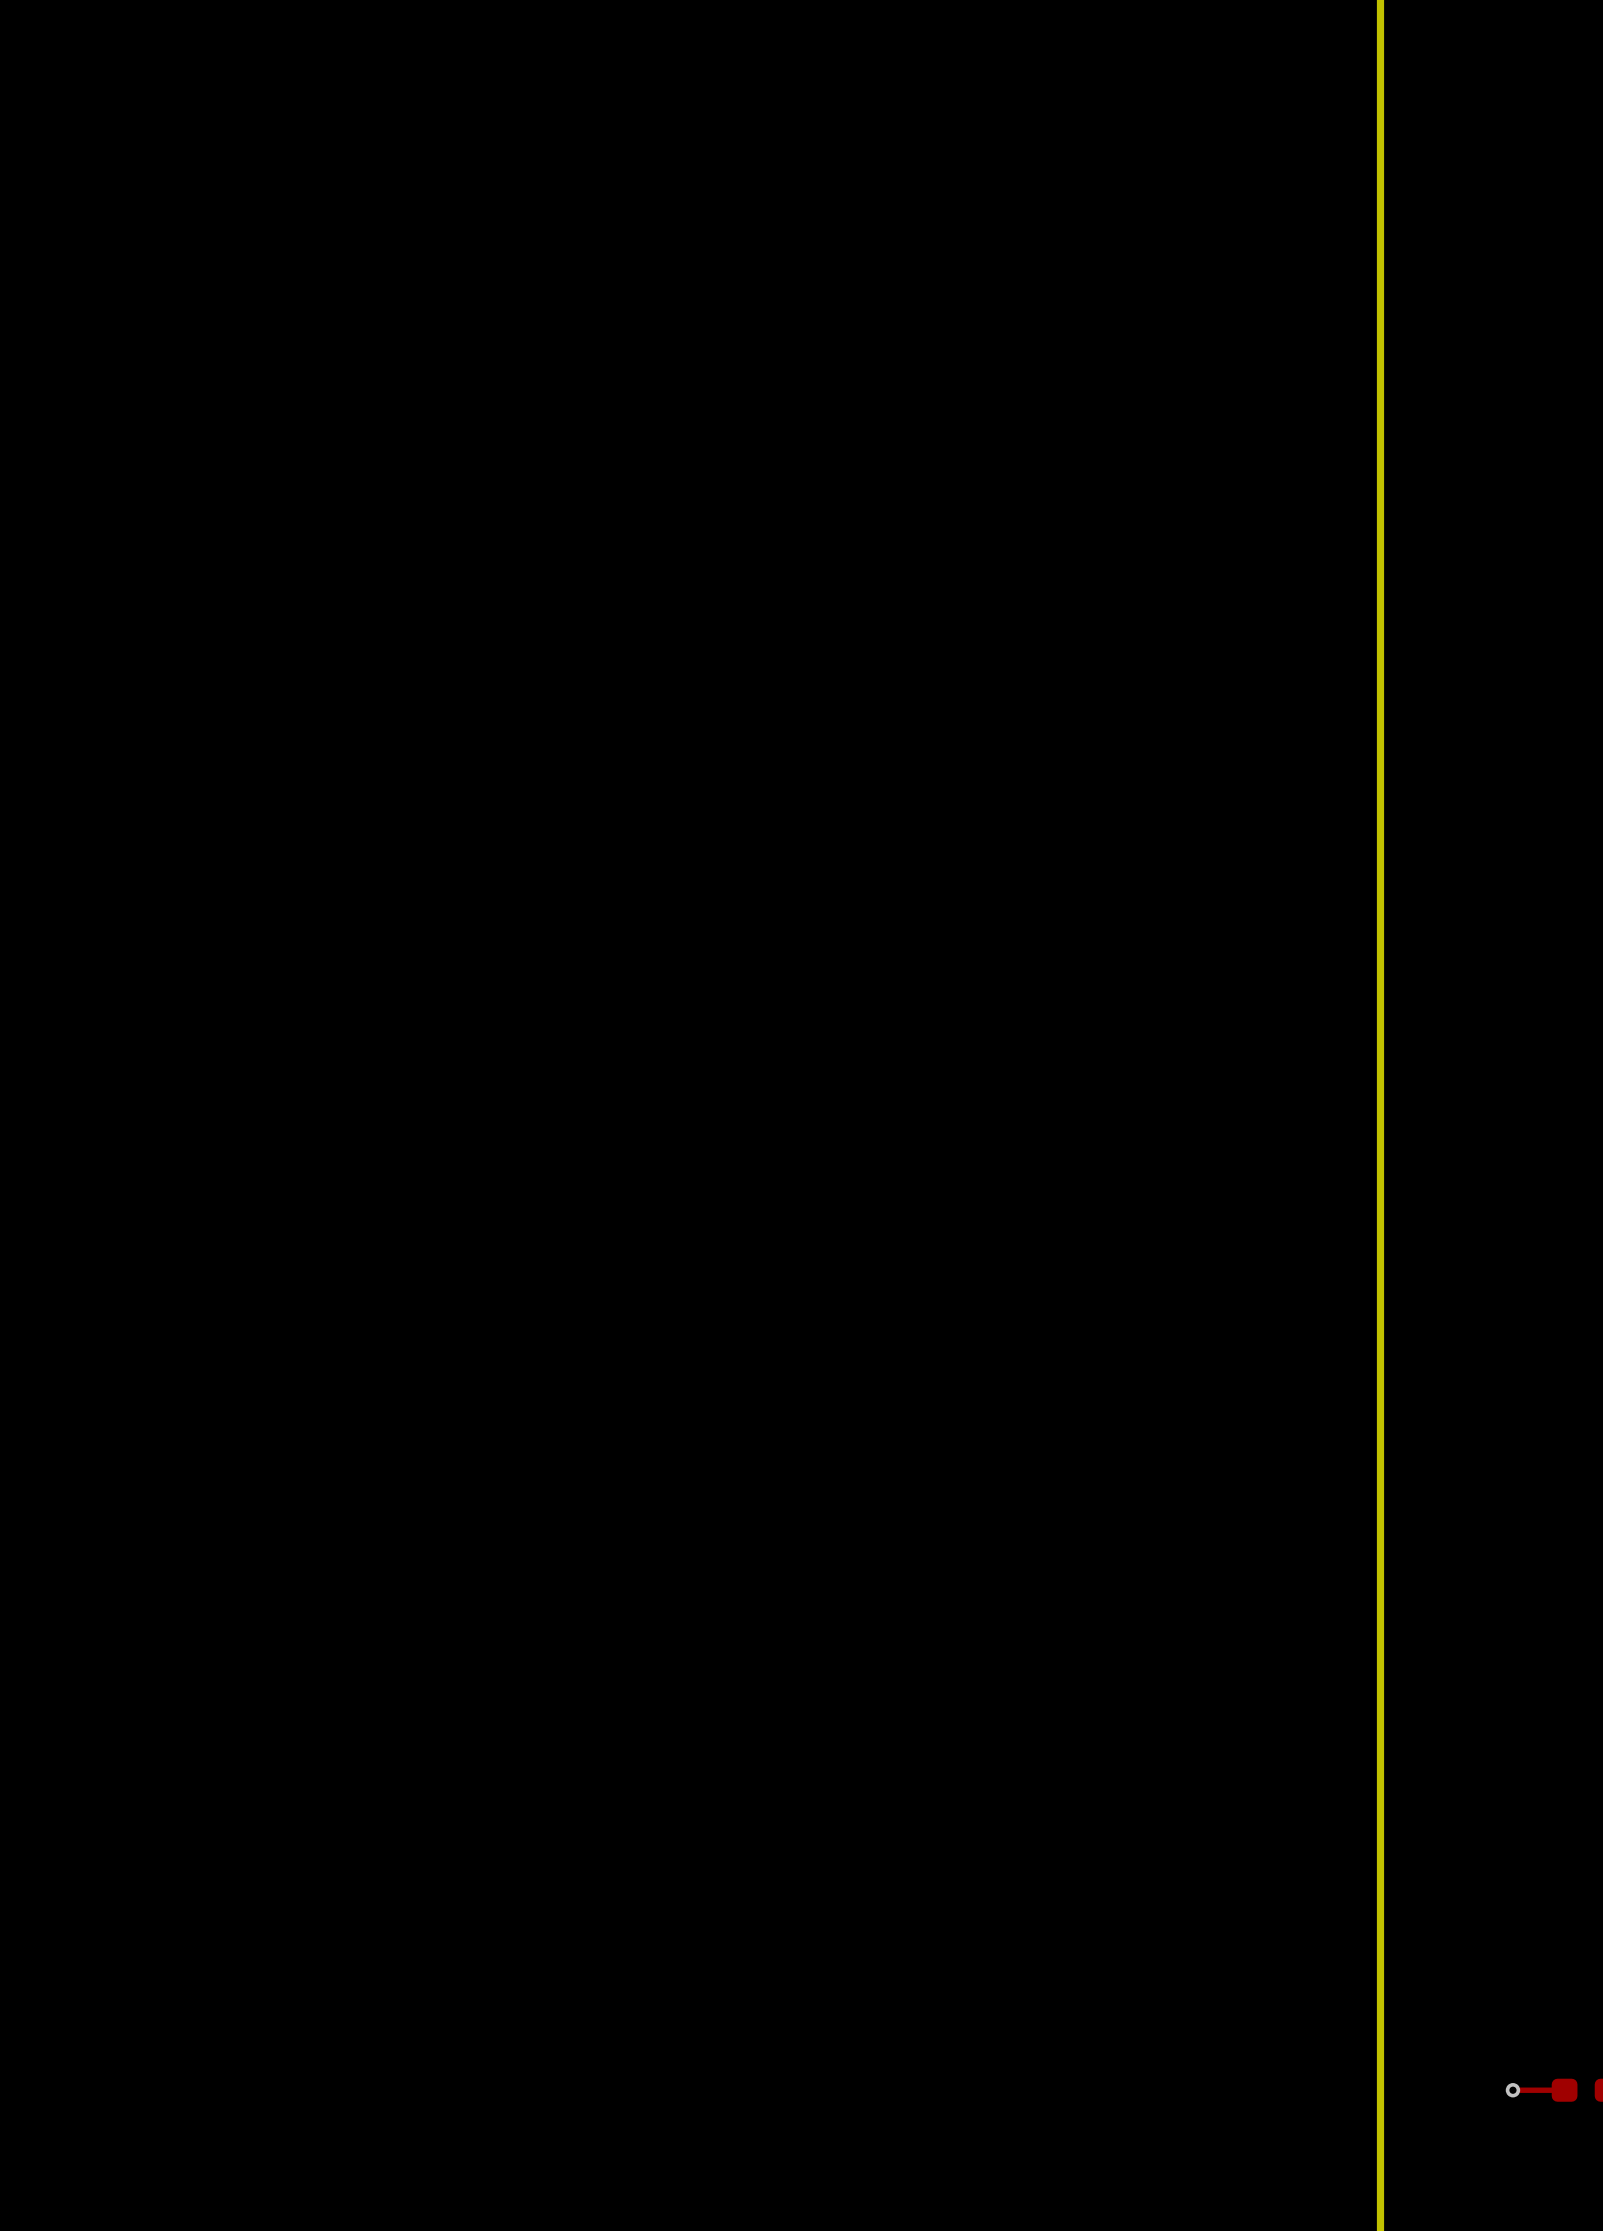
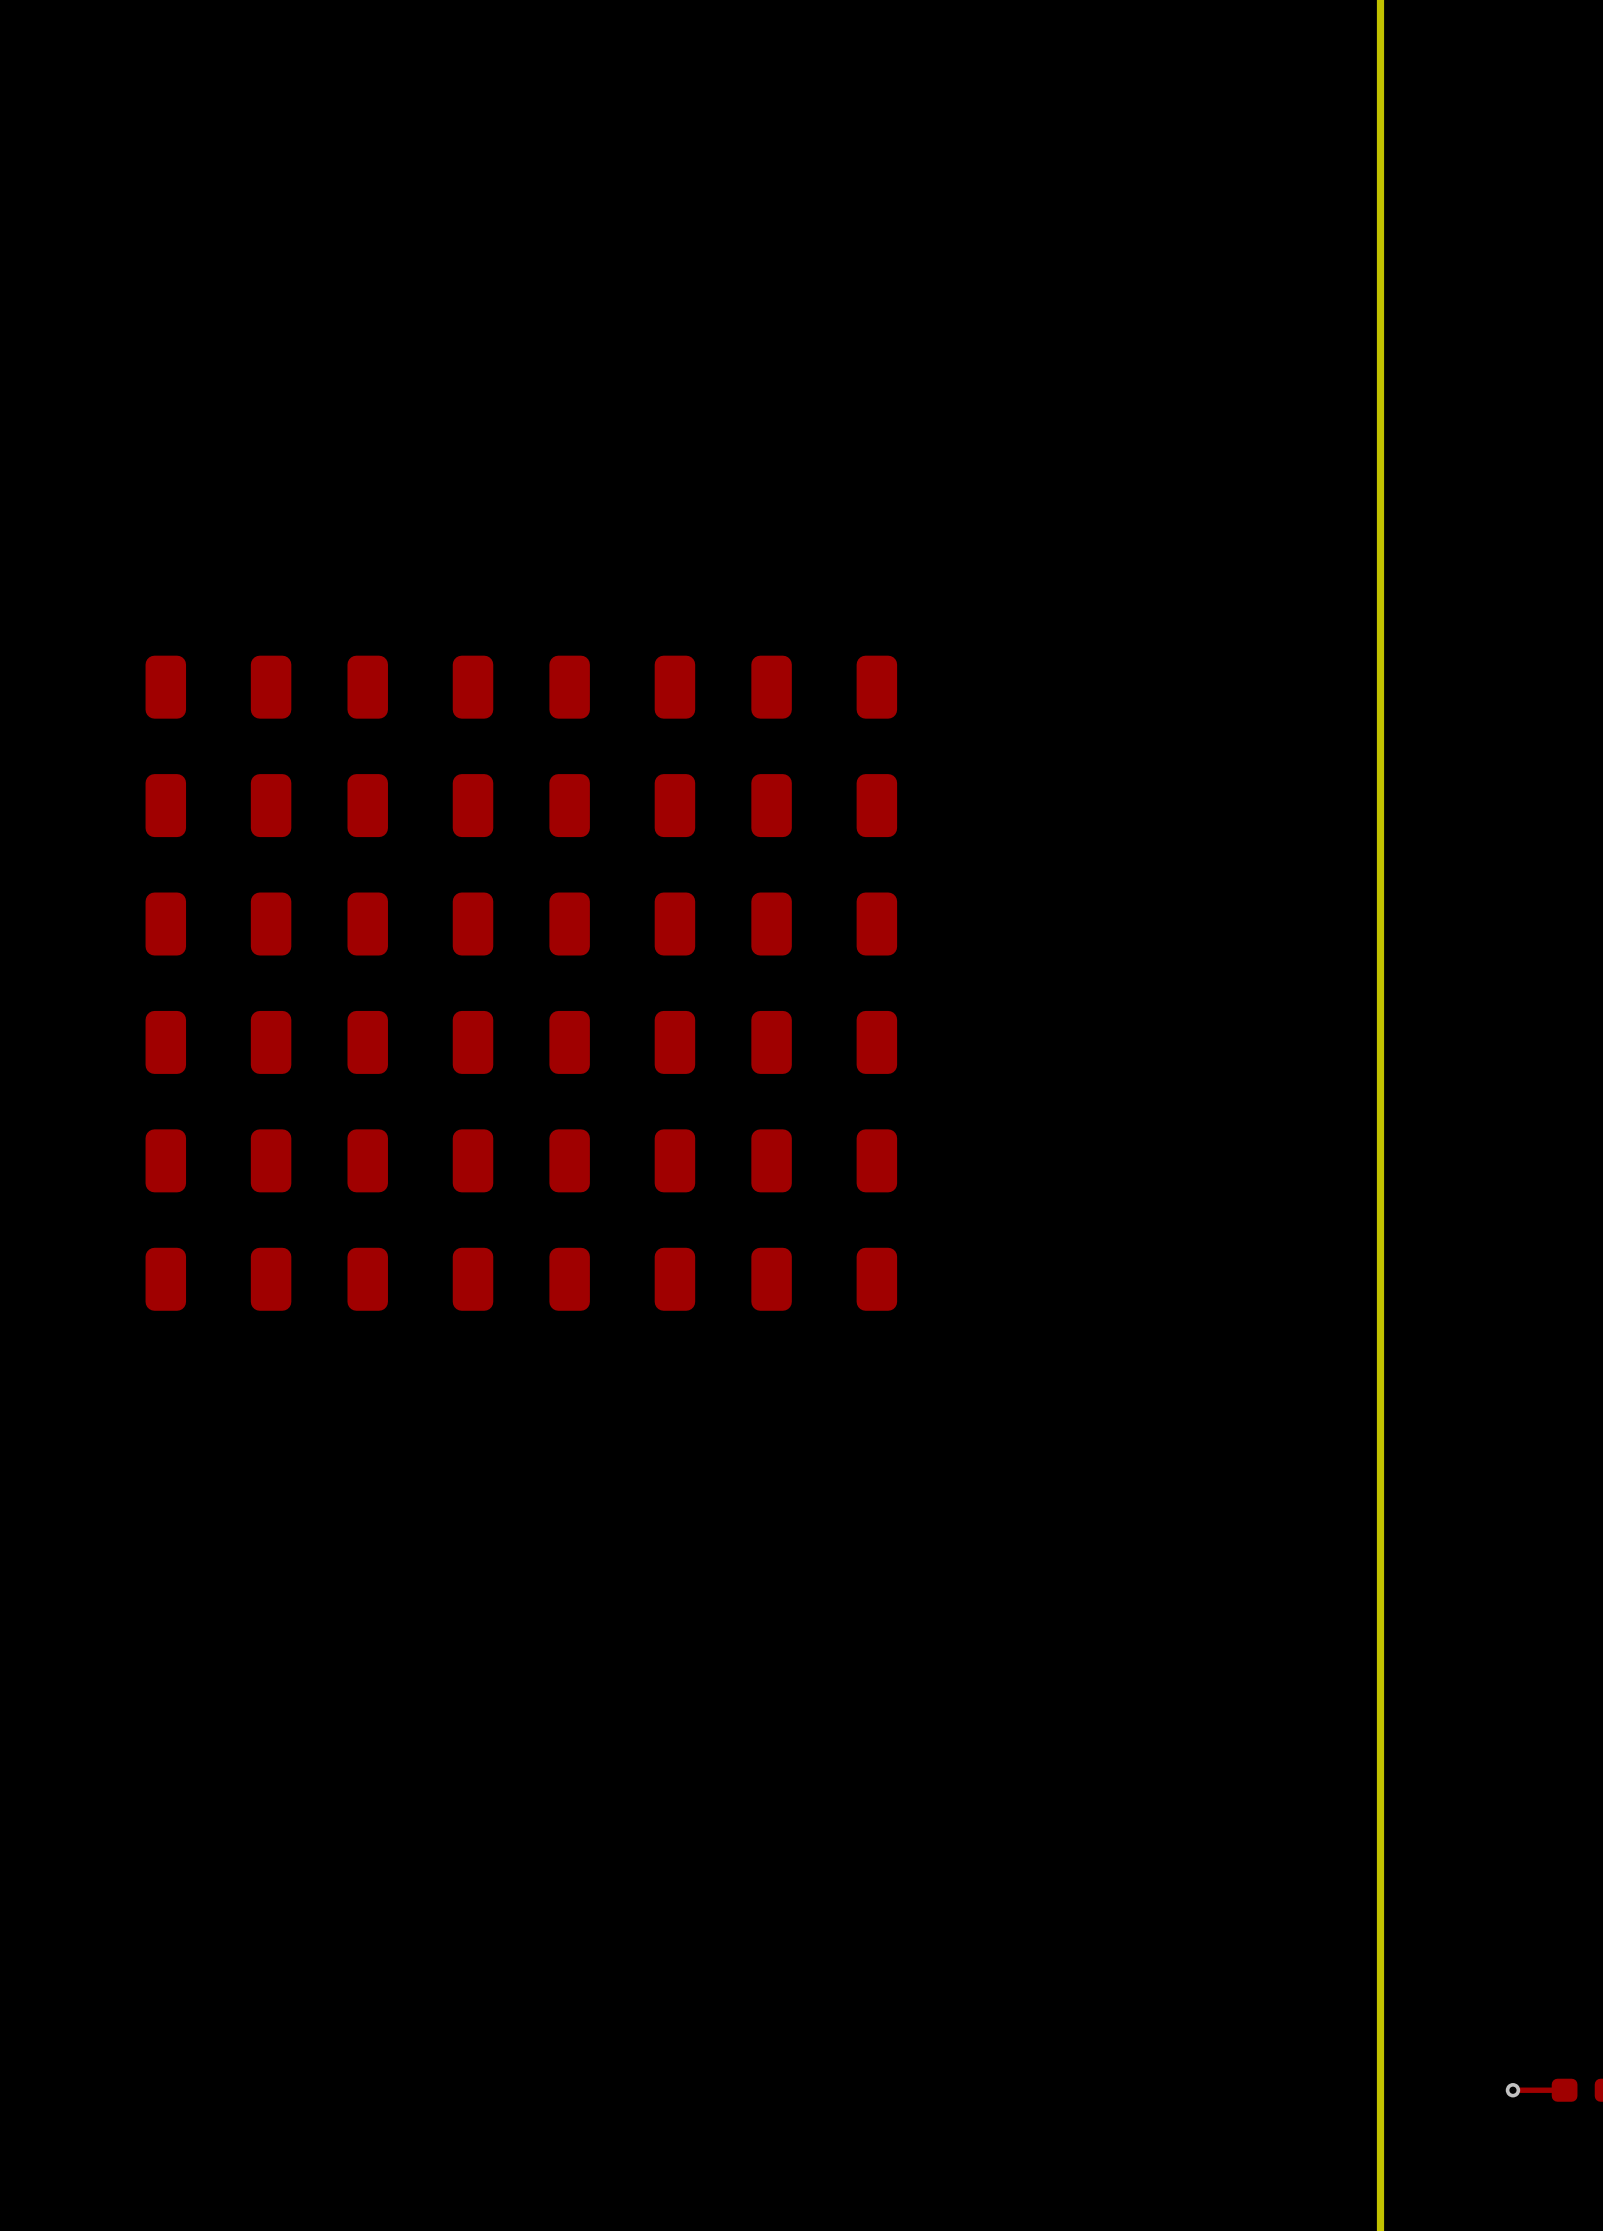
part: none -> (218, 687)
part: none -> (420, 687)
part: none -> (622, 687)
part: none -> (824, 687)
part: none -> (218, 805)
part: none -> (420, 805)
part: none -> (622, 805)
part: none -> (824, 805)
part: none -> (218, 924)
part: none -> (420, 924)
part: none -> (622, 924)
part: none -> (824, 924)
part: none -> (218, 1042)
part: none -> (420, 1042)
part: none -> (622, 1042)
part: none -> (824, 1042)
part: none -> (218, 1160)
part: none -> (420, 1160)
part: none -> (622, 1160)
part: none -> (824, 1160)
part: none -> (218, 1279)
part: none -> (420, 1279)
part: none -> (622, 1279)
part: none -> (824, 1279)

